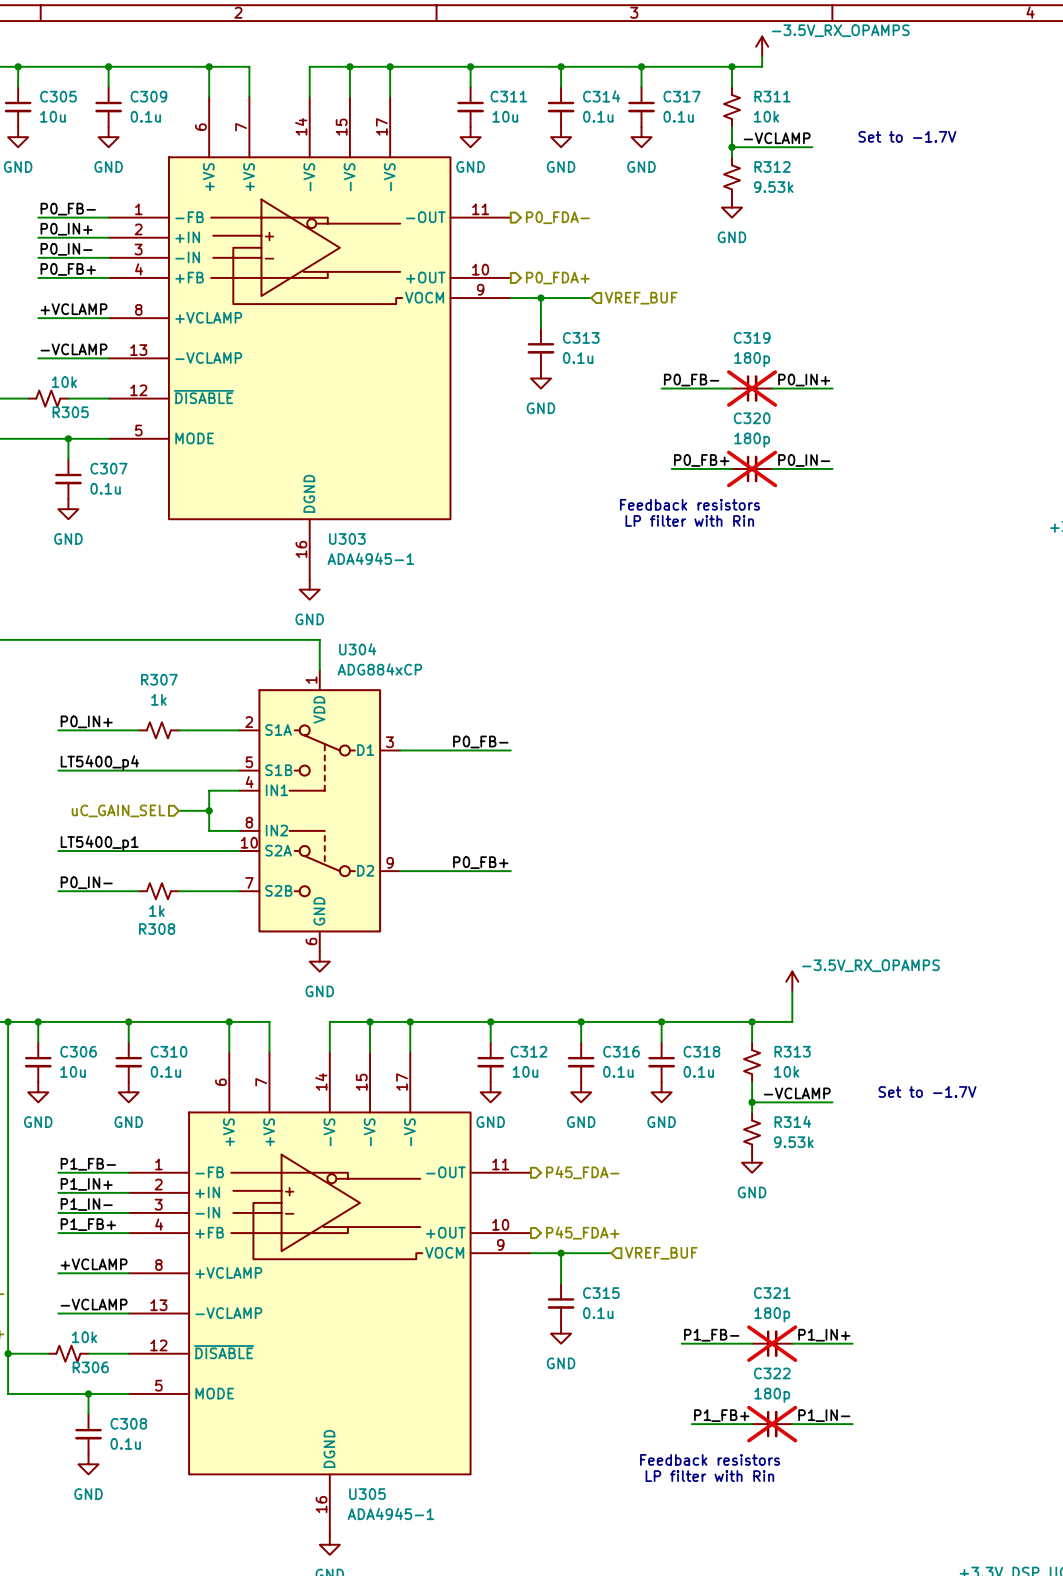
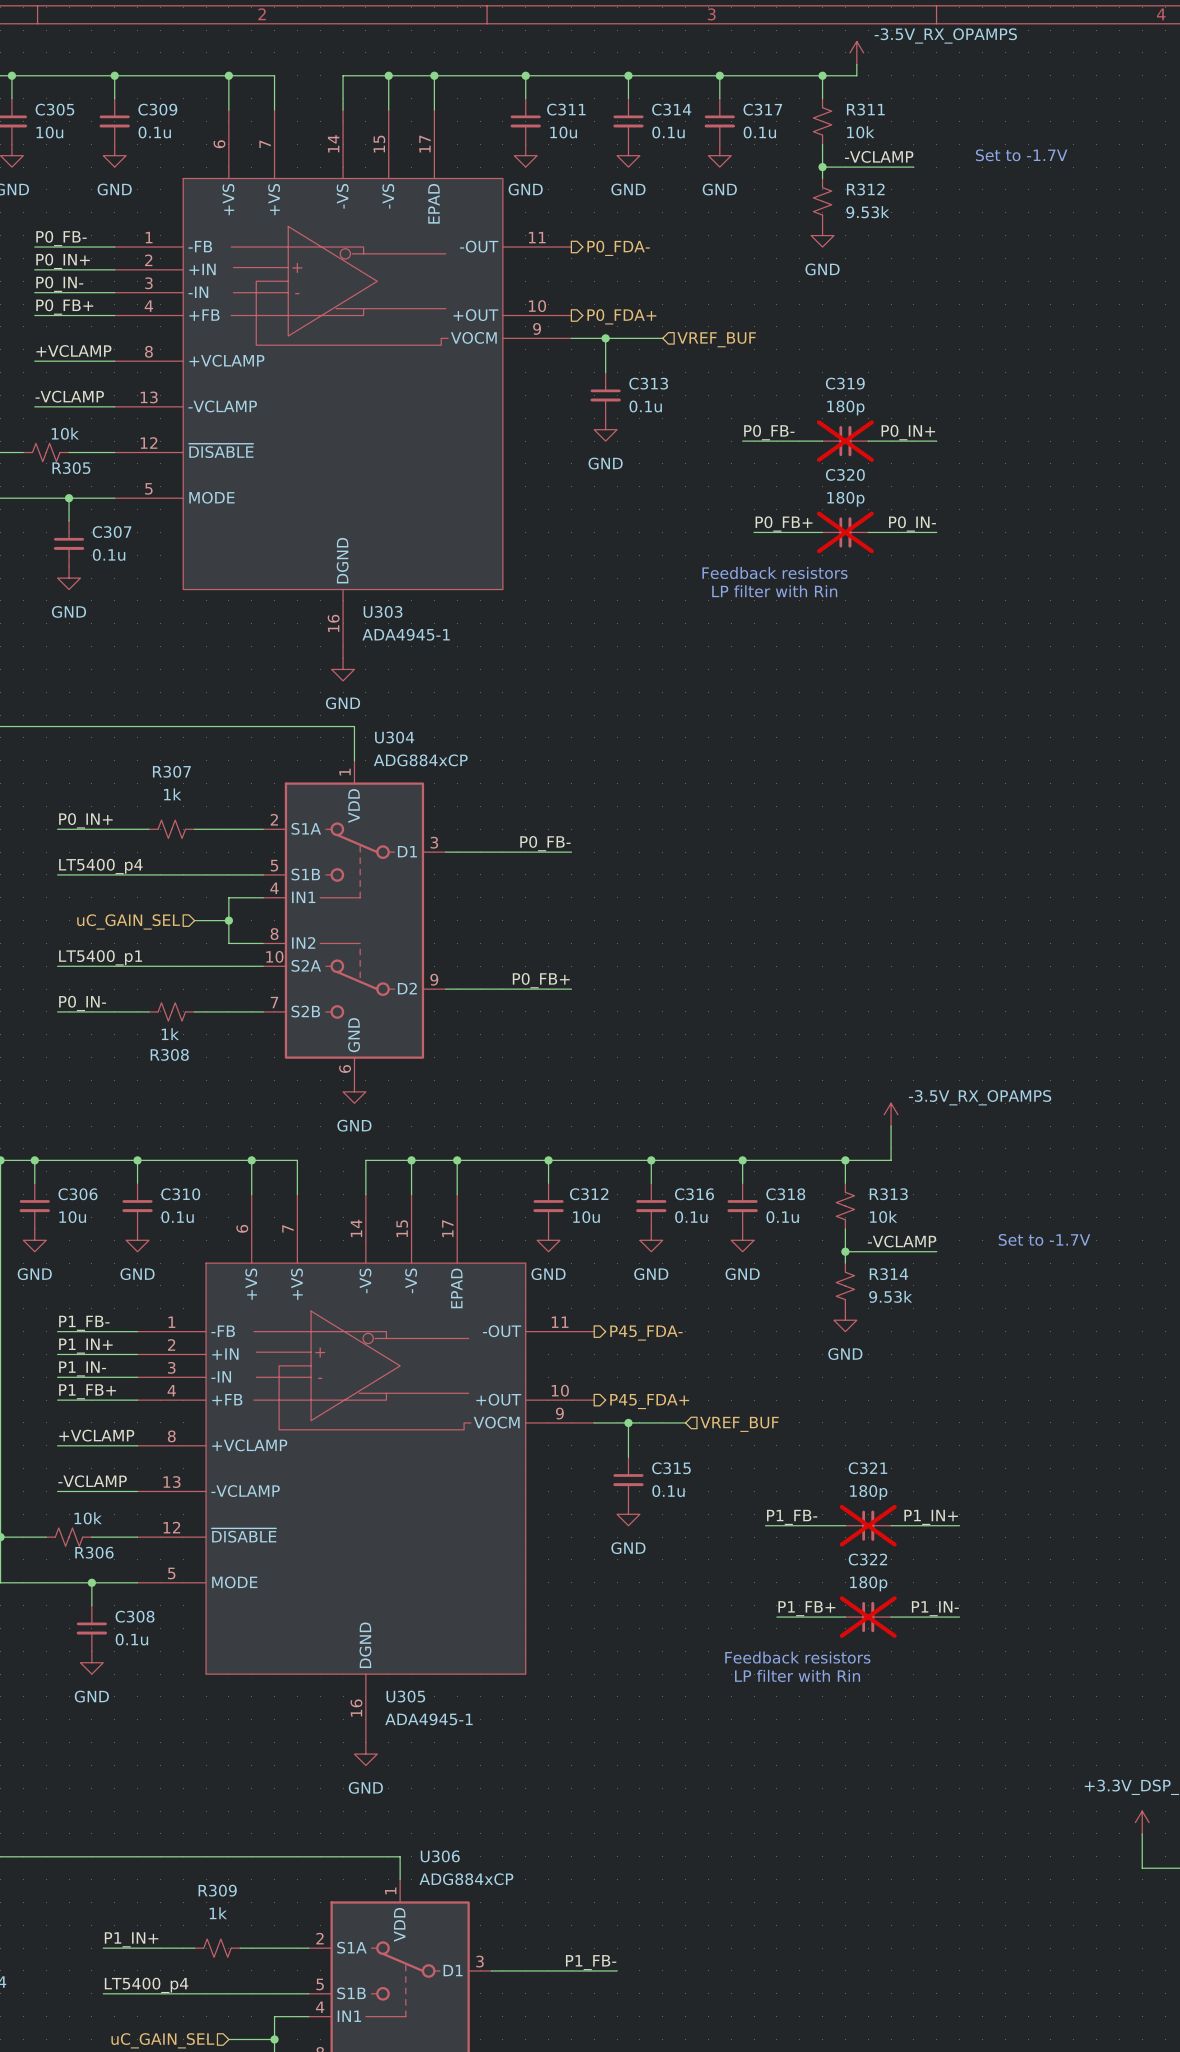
U303 pin name: -VS (389, 177) -> EPAD (433, 203)
U305 pin name: -VS (409, 1132) -> EPAD (456, 1288)

